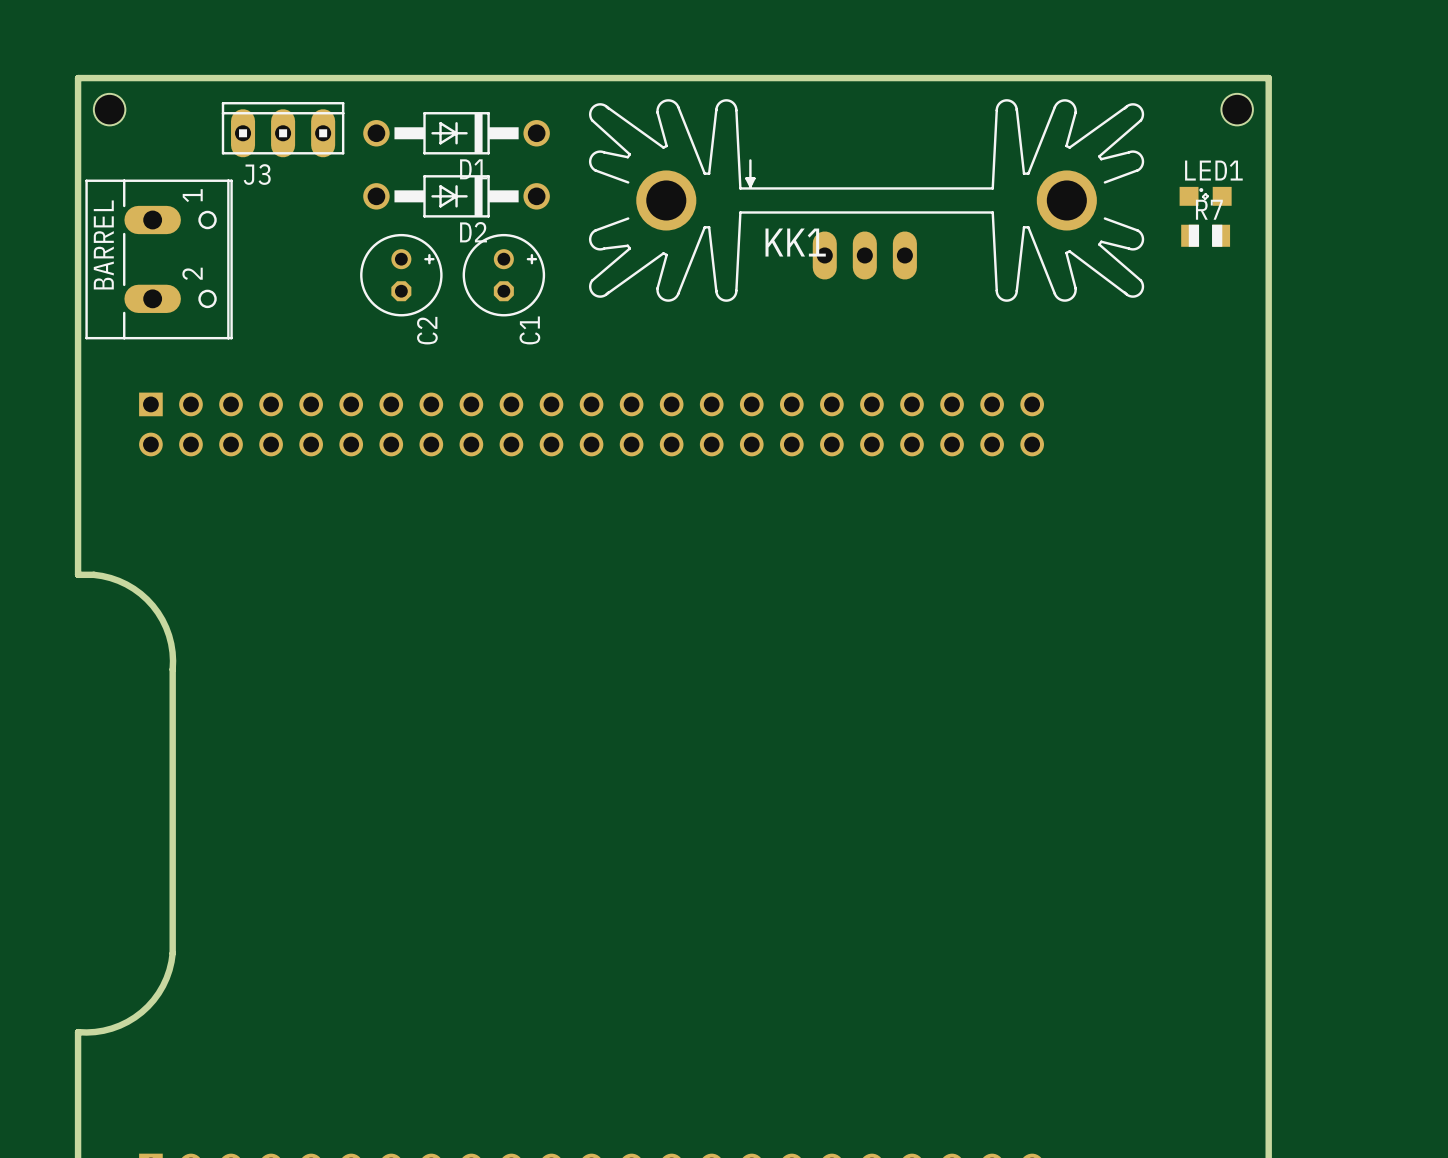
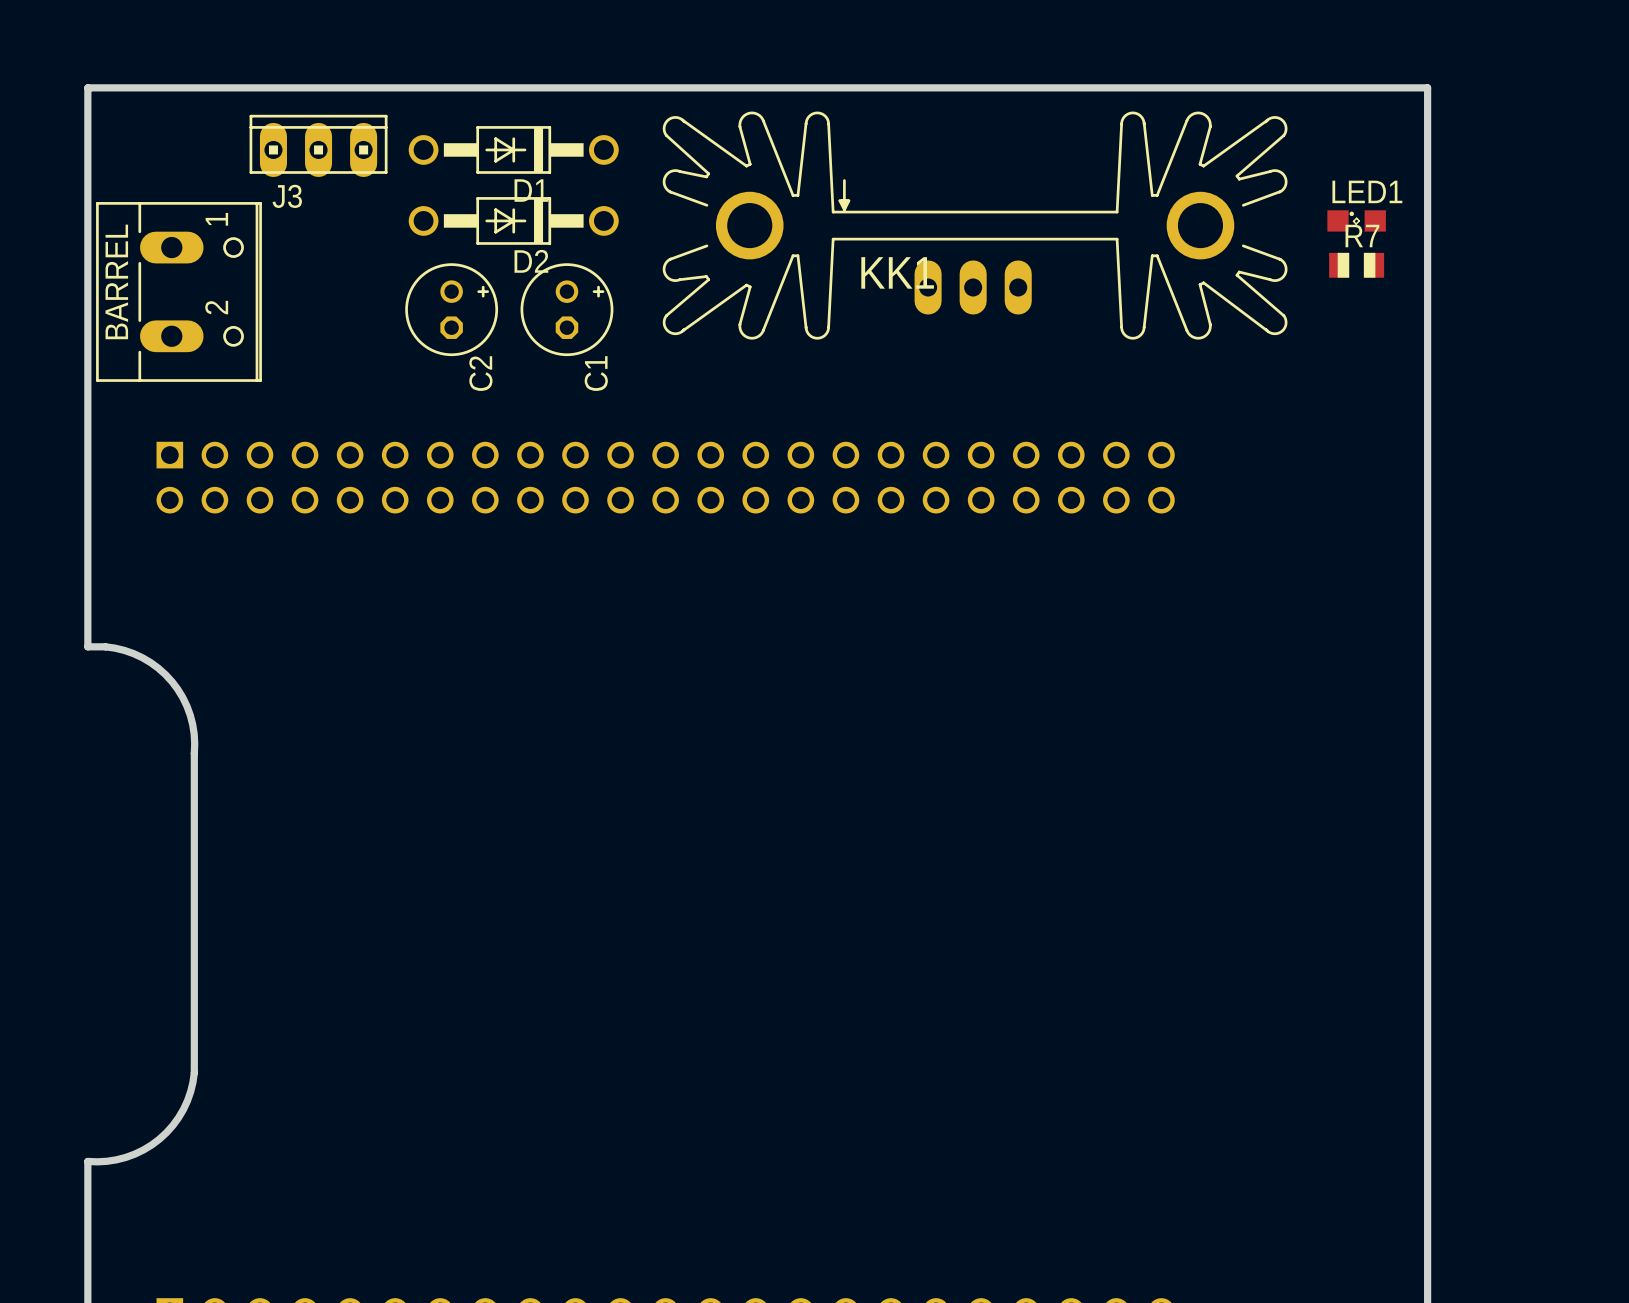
hole: (109, 109) -> none
hole: (1237, 109) -> none

